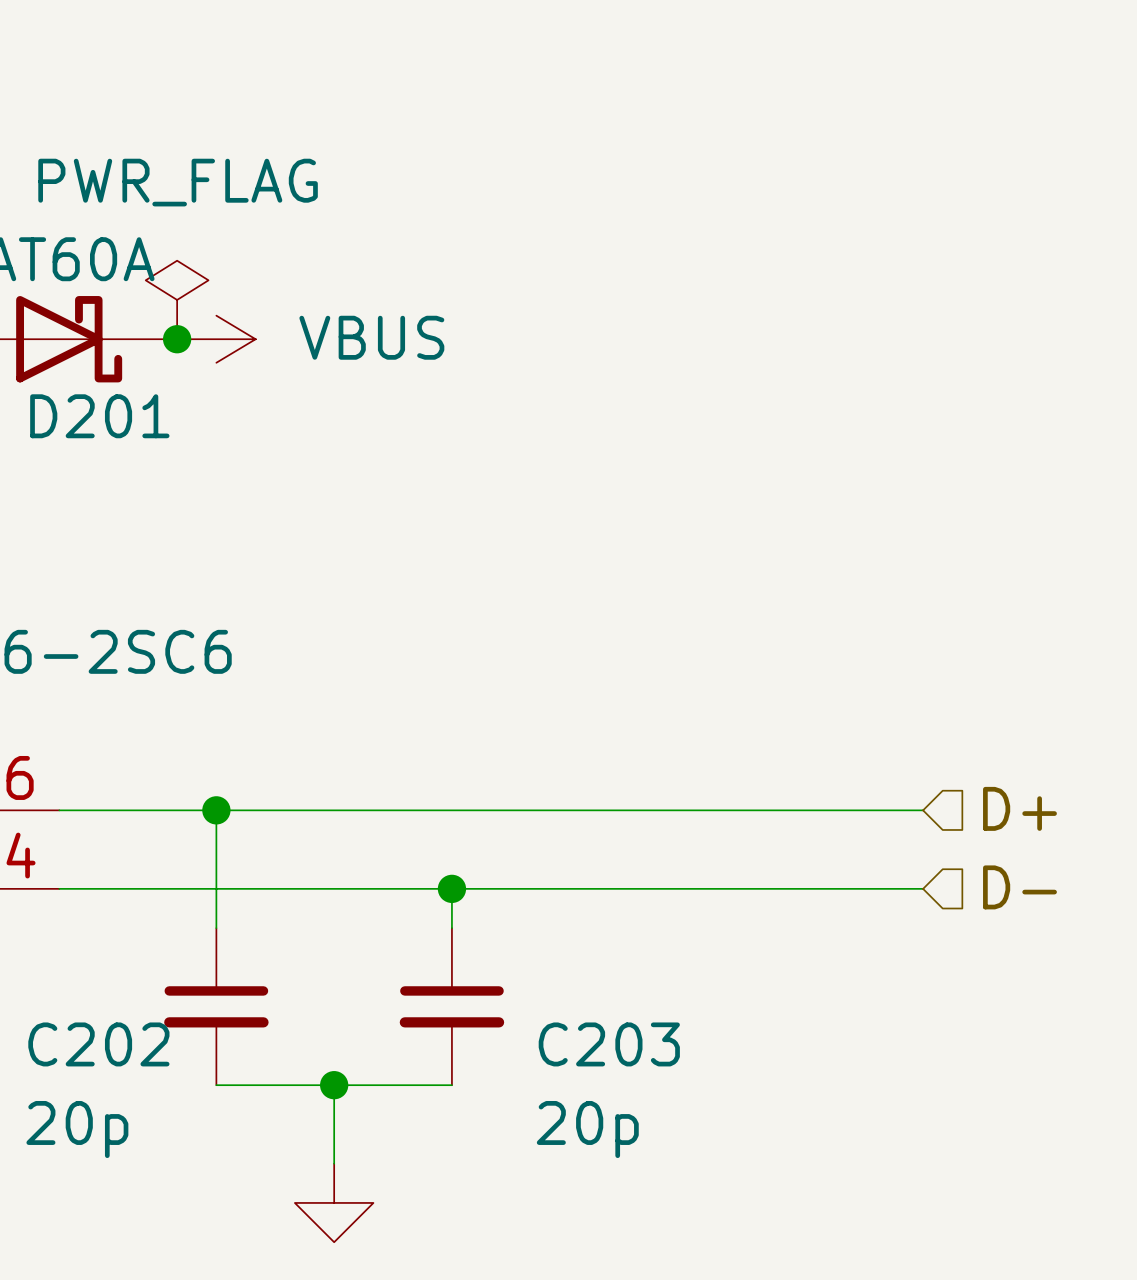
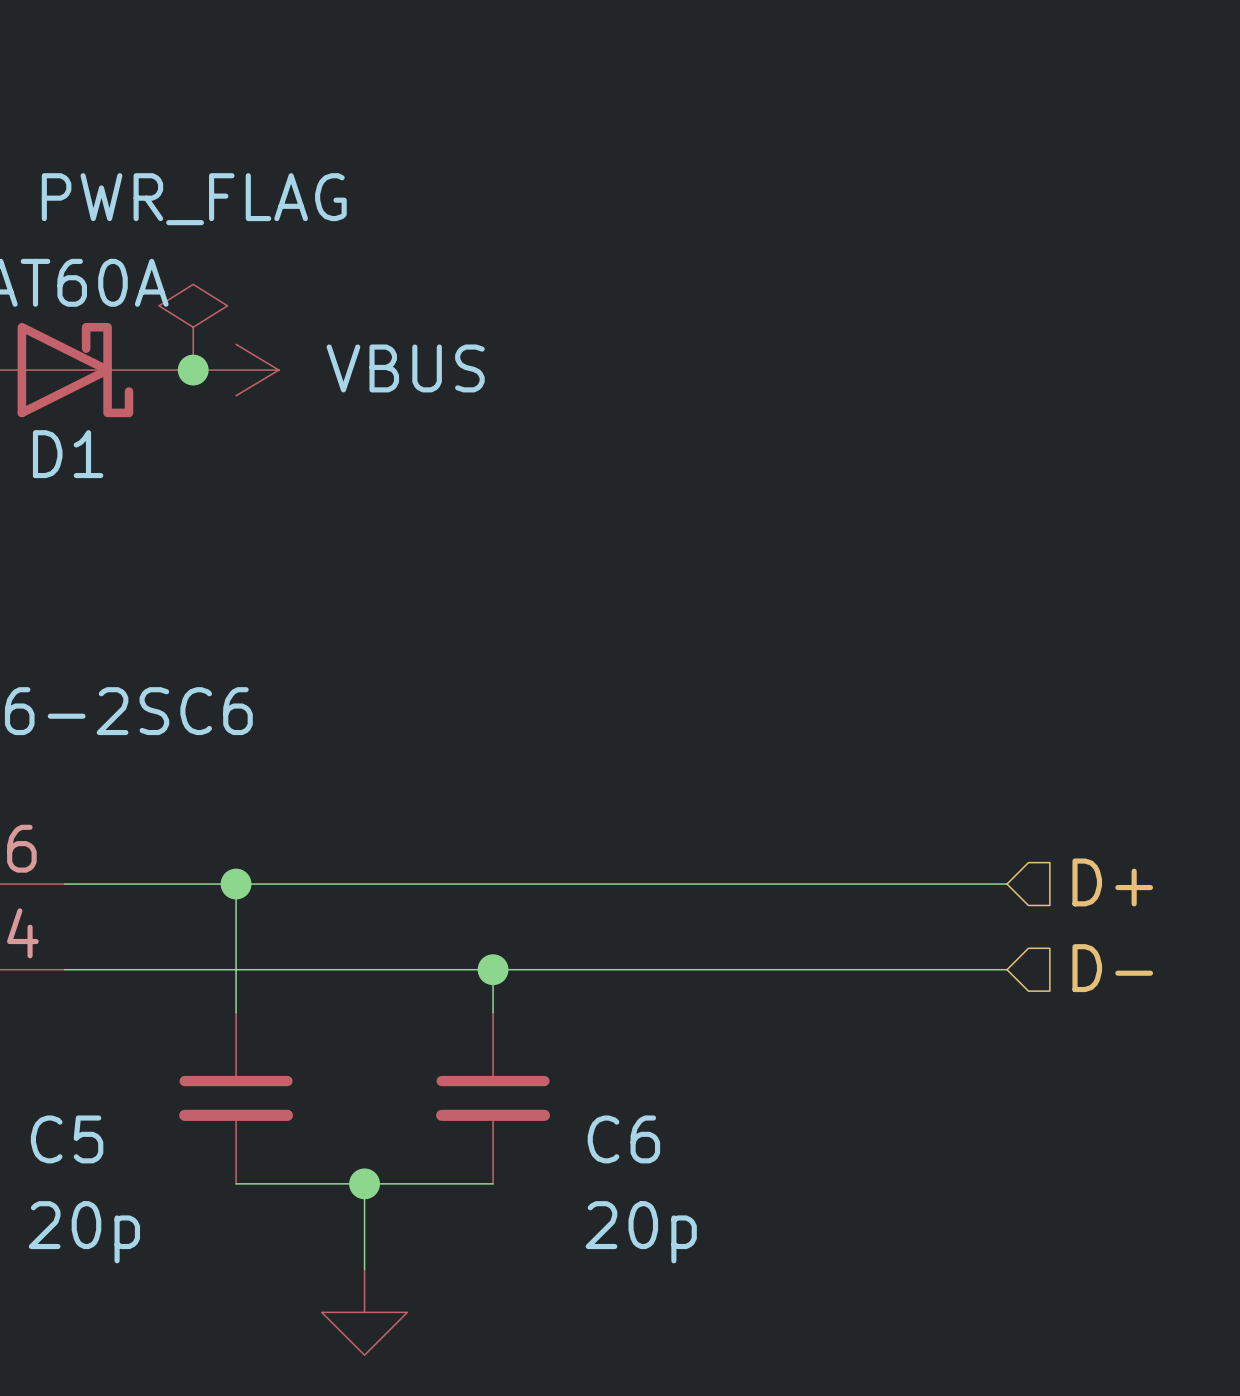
D201 name: D201 (99, 416) -> D1 (68, 454)
C202 name: C202 (98, 1044) -> C5 (67, 1139)
C203 name: C203 (609, 1044) -> C6 (623, 1139)

